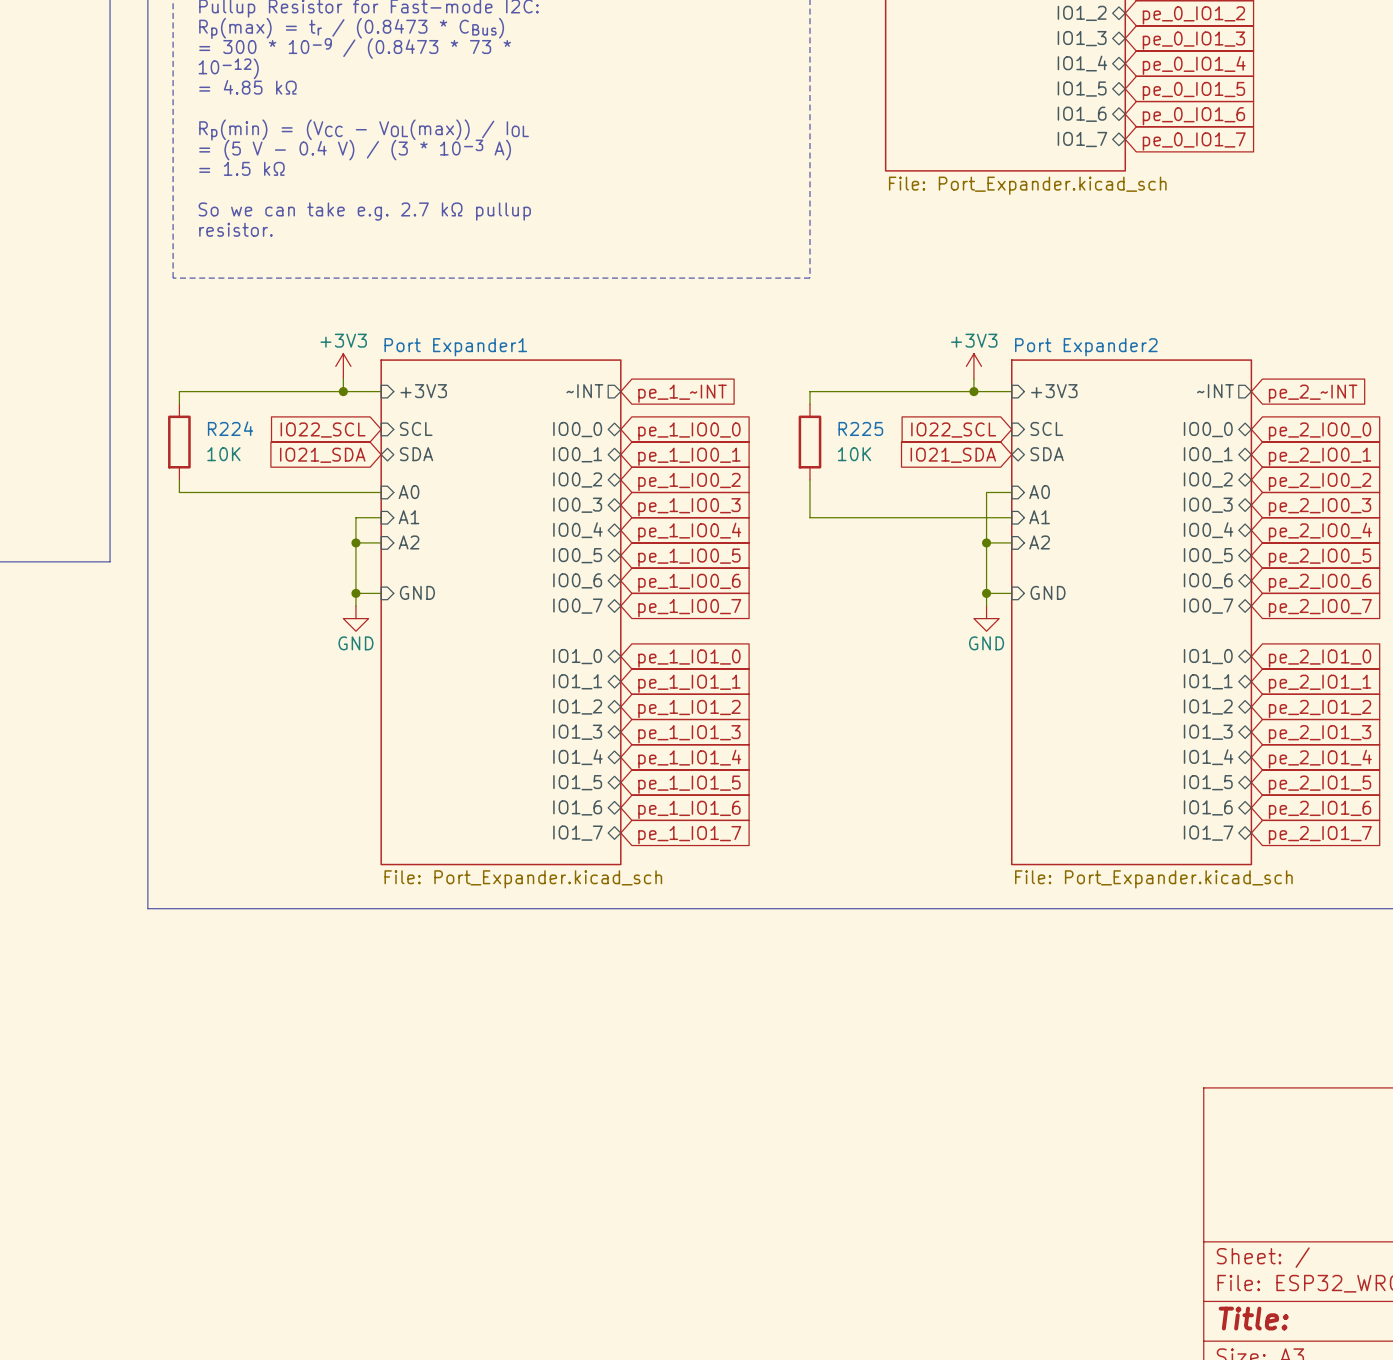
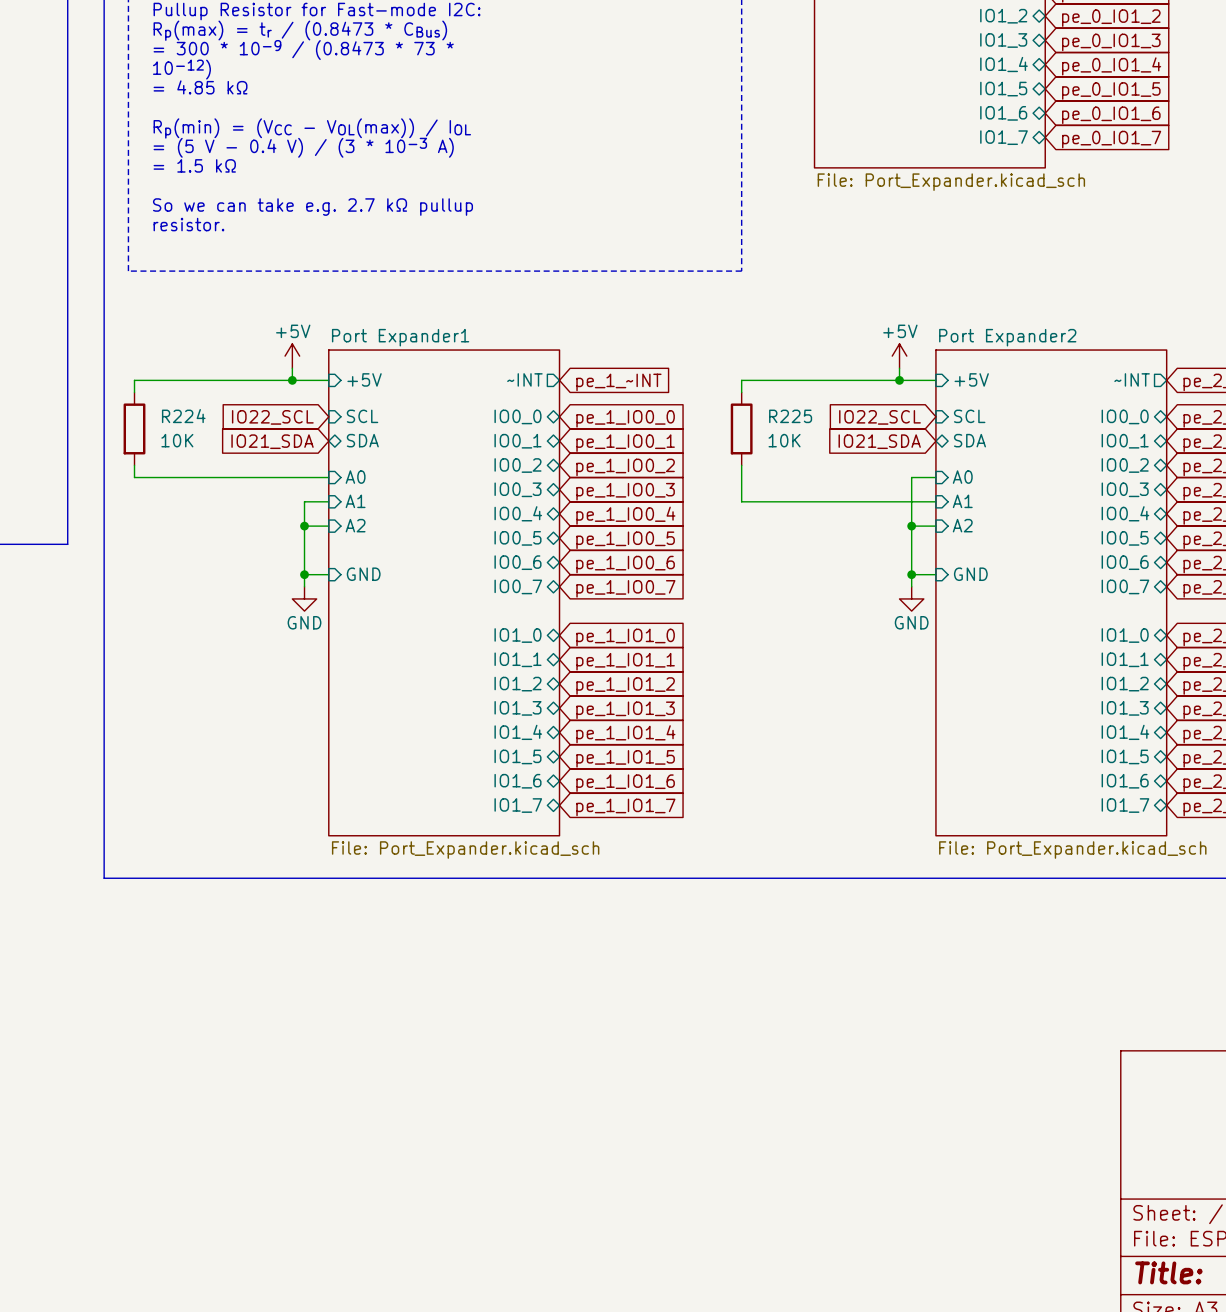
power symbol: +3V3 (343, 366) -> +5V (292, 356)
power symbol: +3V3 (973, 366) -> +5V (899, 356)
sheet pin: +3V3 (423, 391) -> +5V (364, 379)
sheet pin: +3V3 (1054, 391) -> +5V (971, 379)

